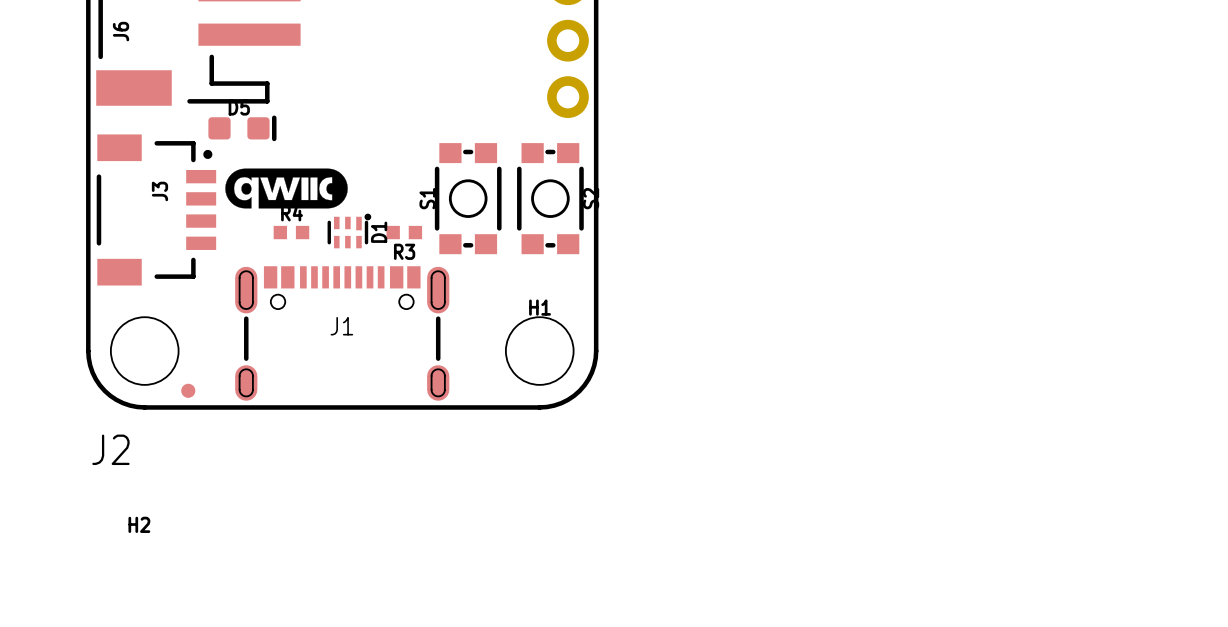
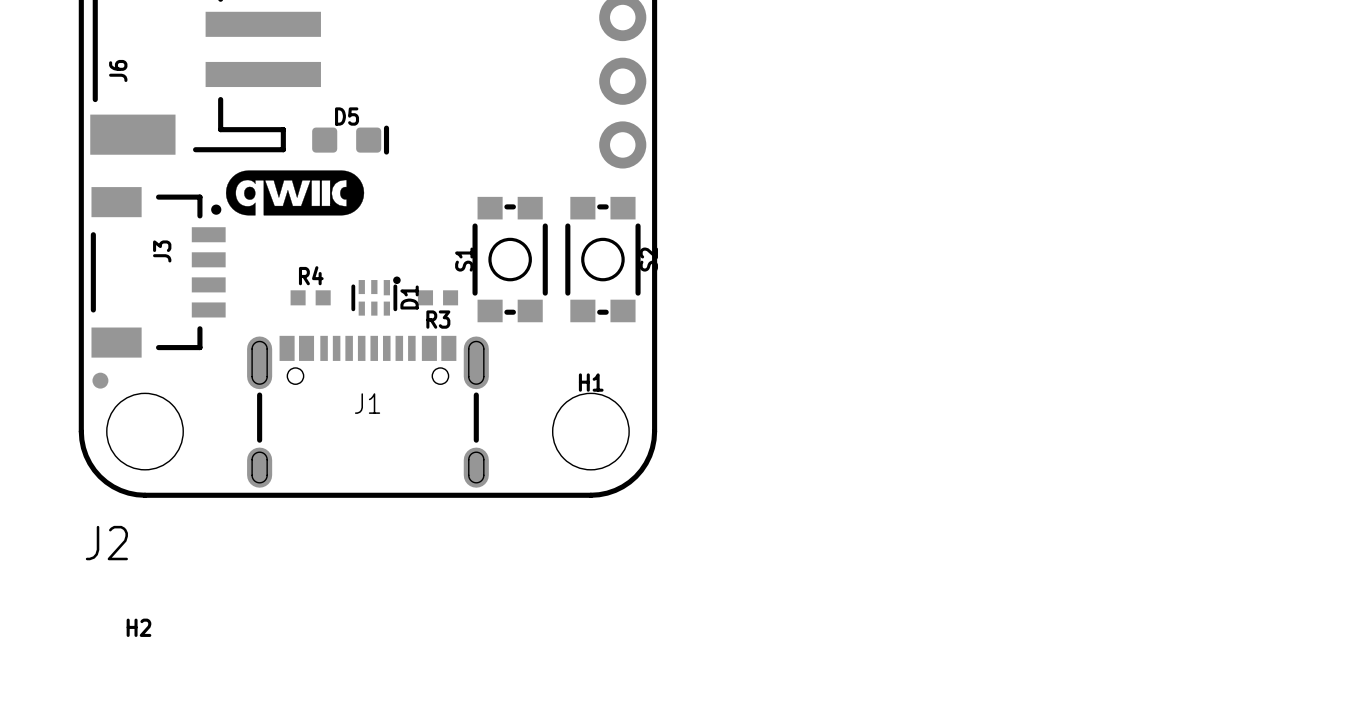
D5 position: (242, 128) -> (350, 140)
drawing position: (286, 188) -> (295, 192)
part position: (188, 390) -> (100, 380)

